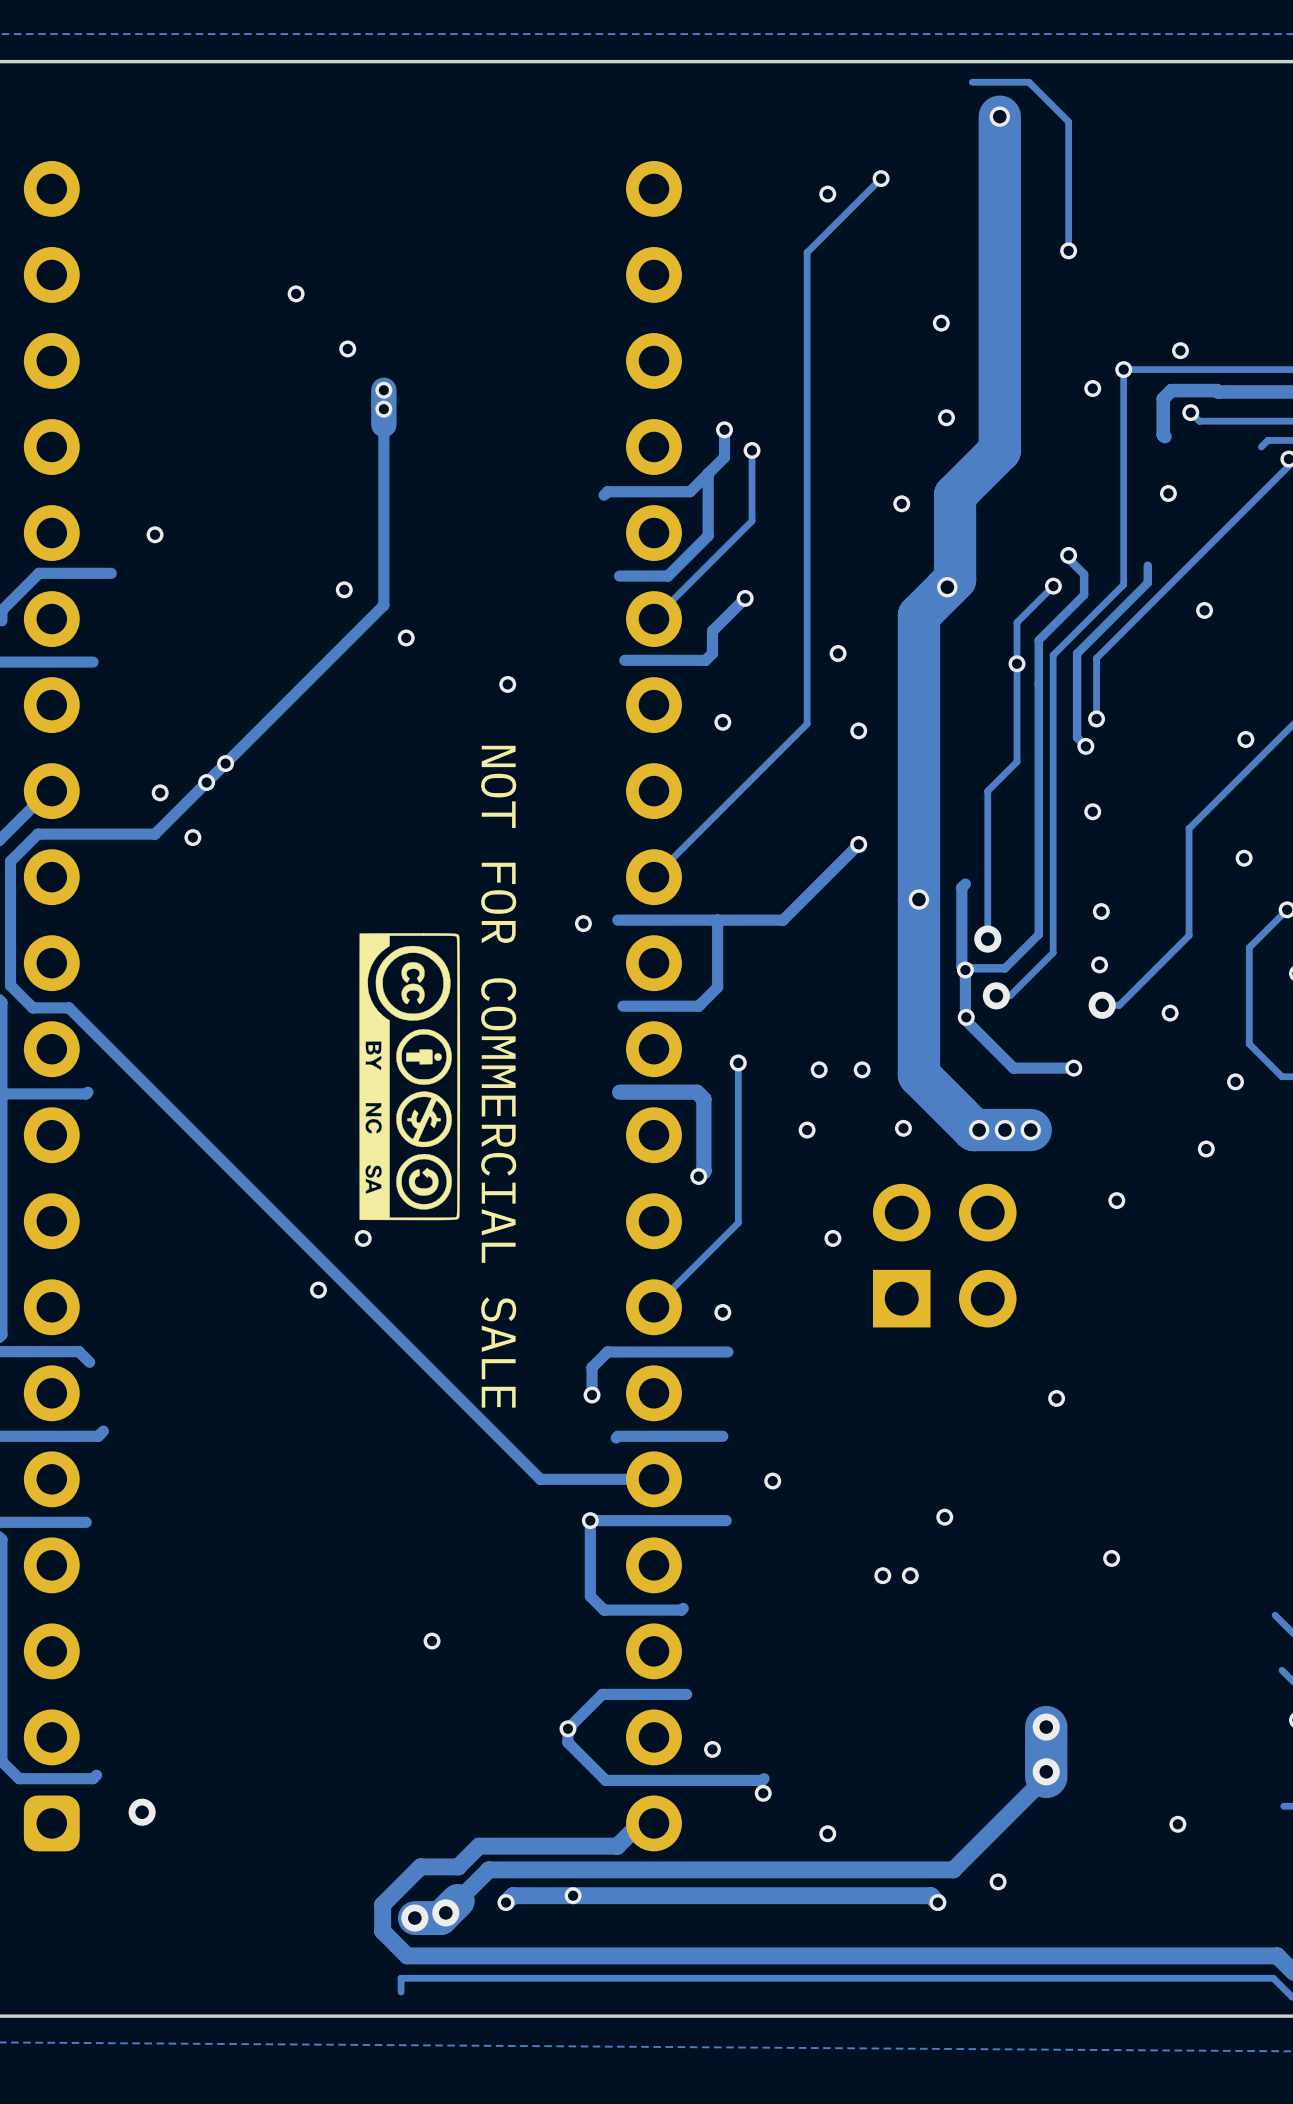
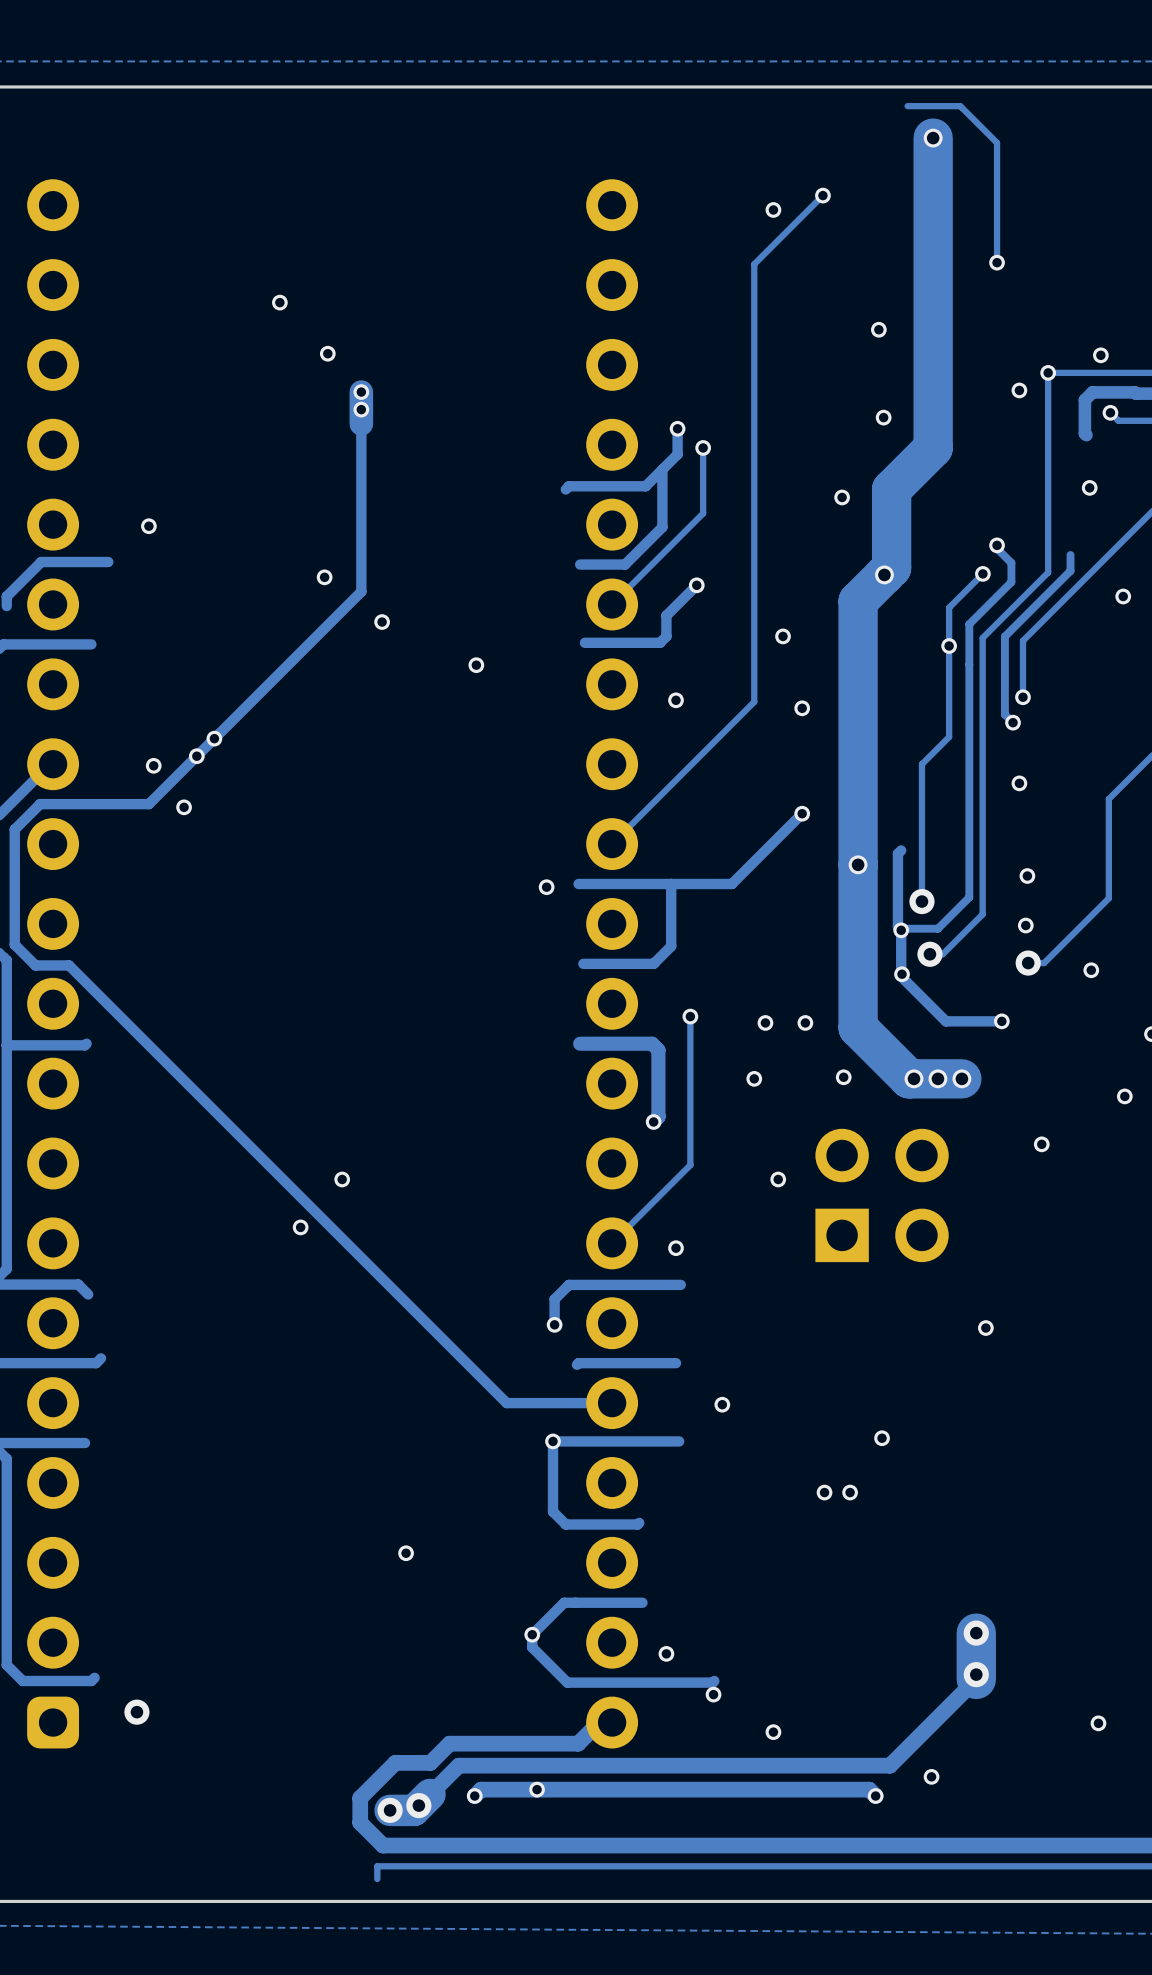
drawing: [359, 933, 461, 1221] -> none
text: NOT FOR COMMERCIAL SALE (498, 1076) -> none
via: (1111, 1558) -> none

